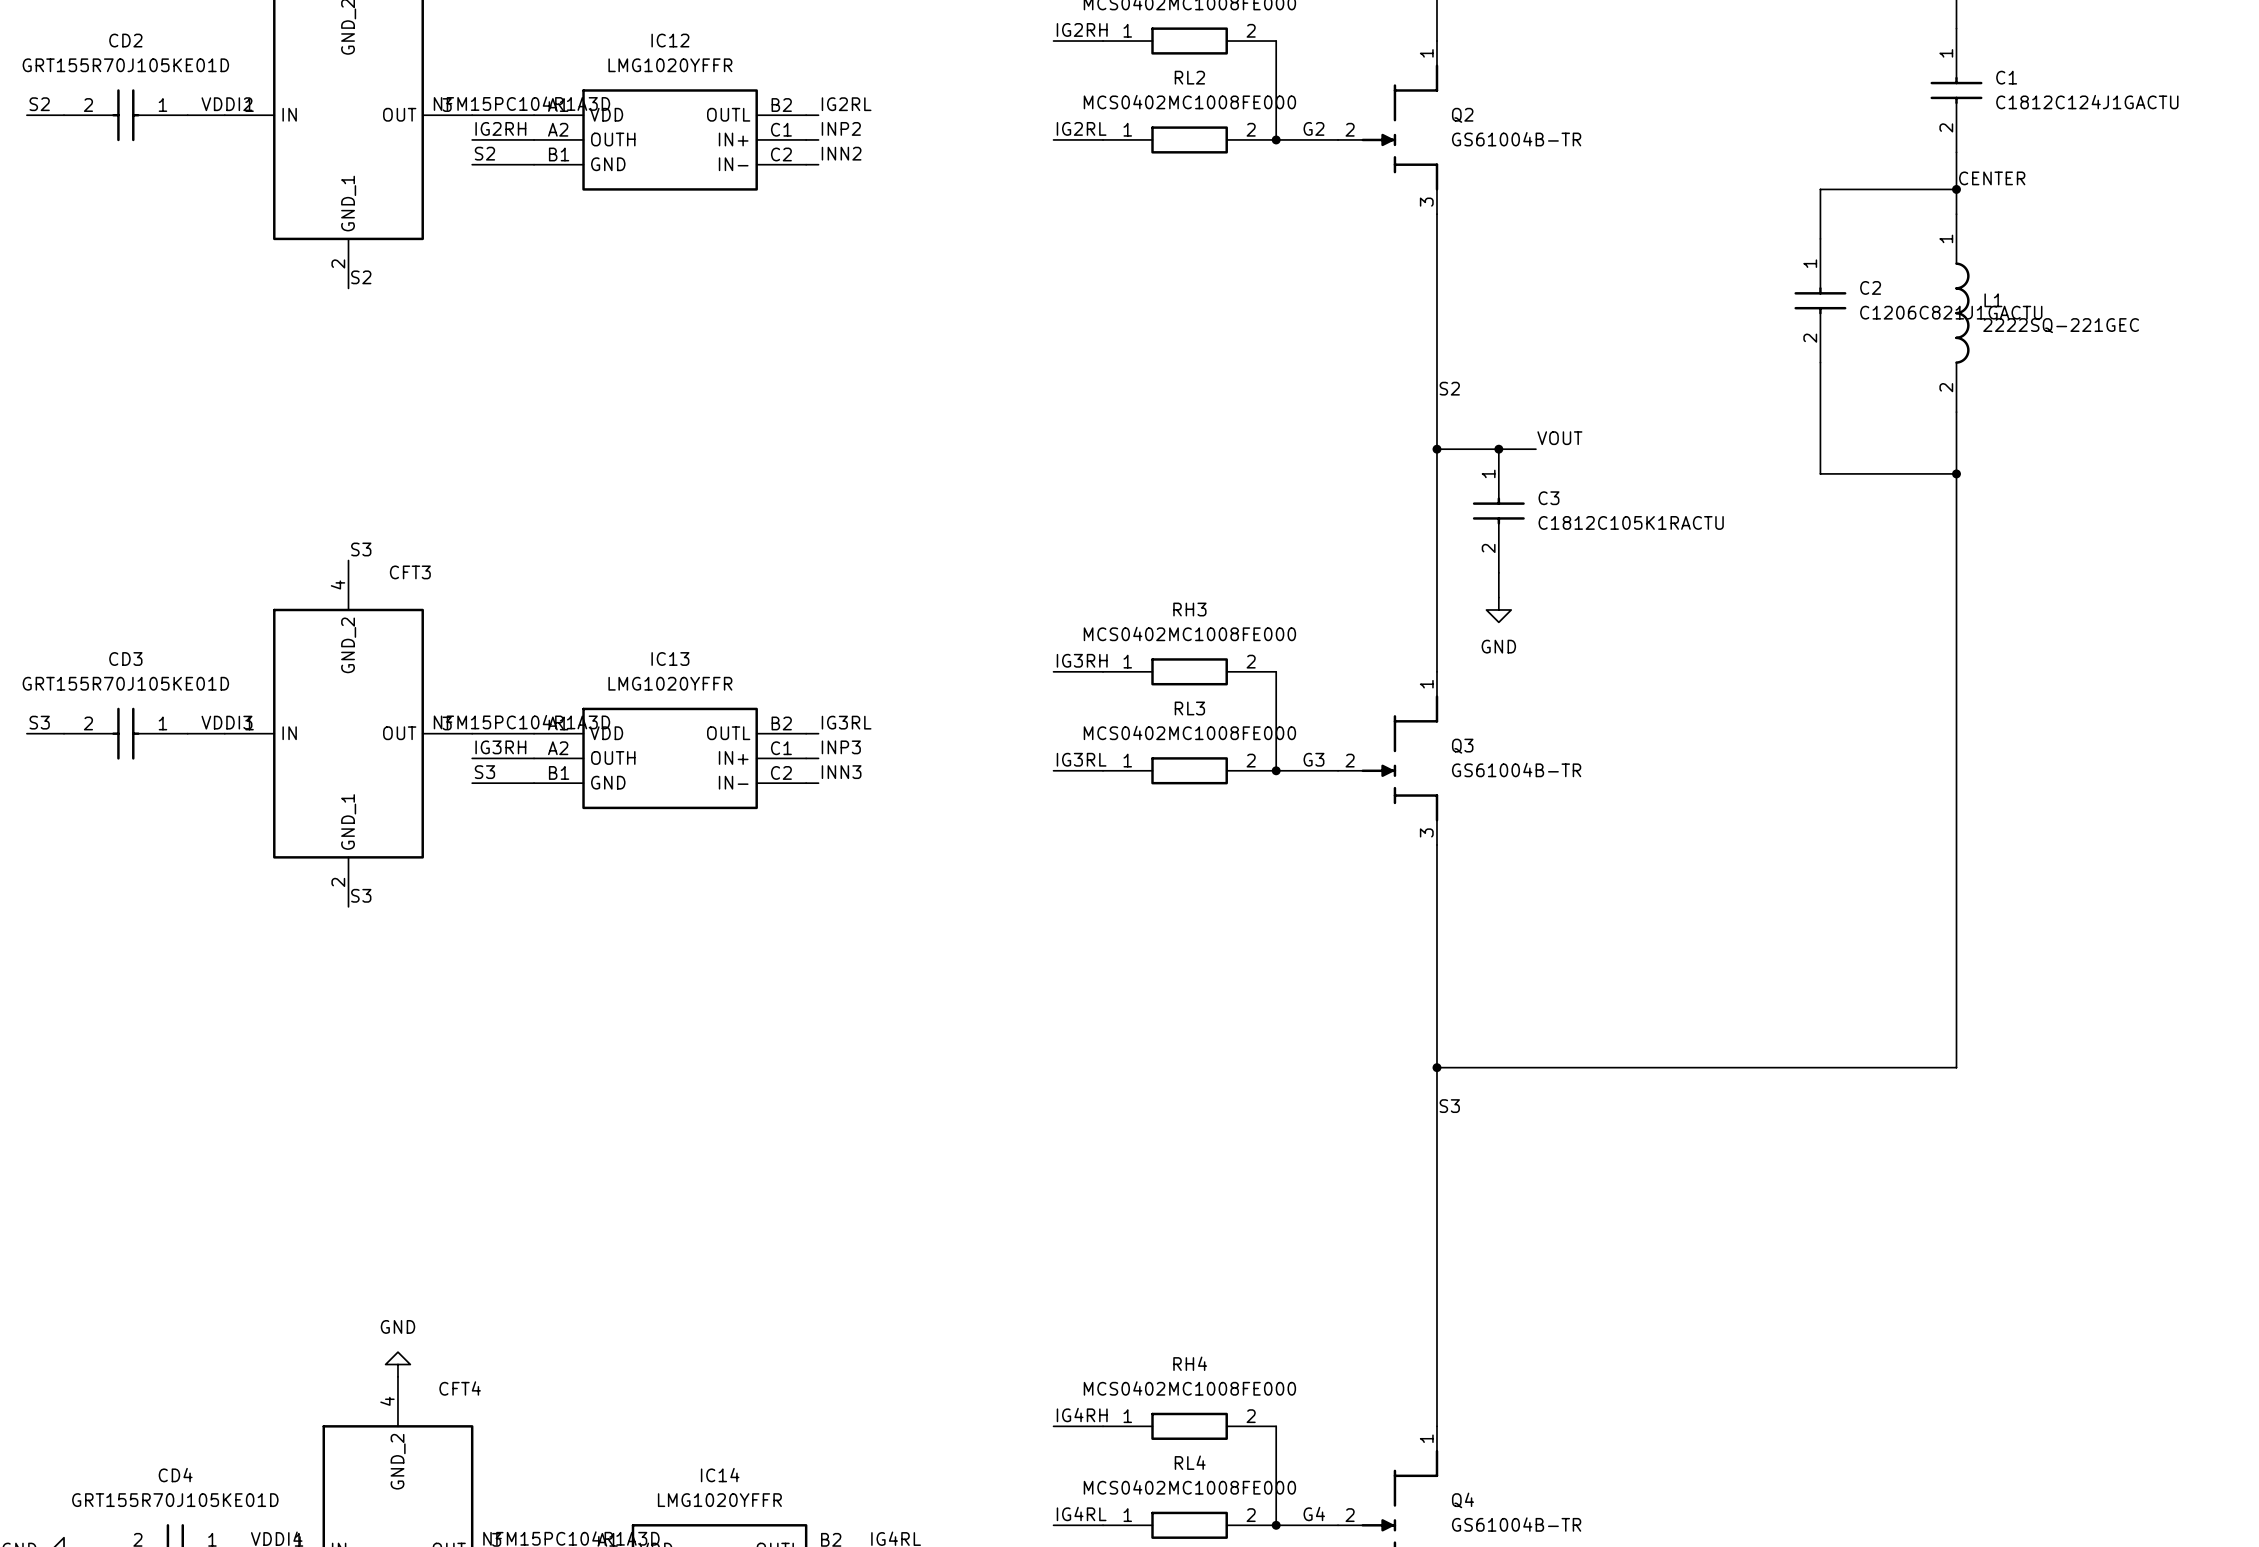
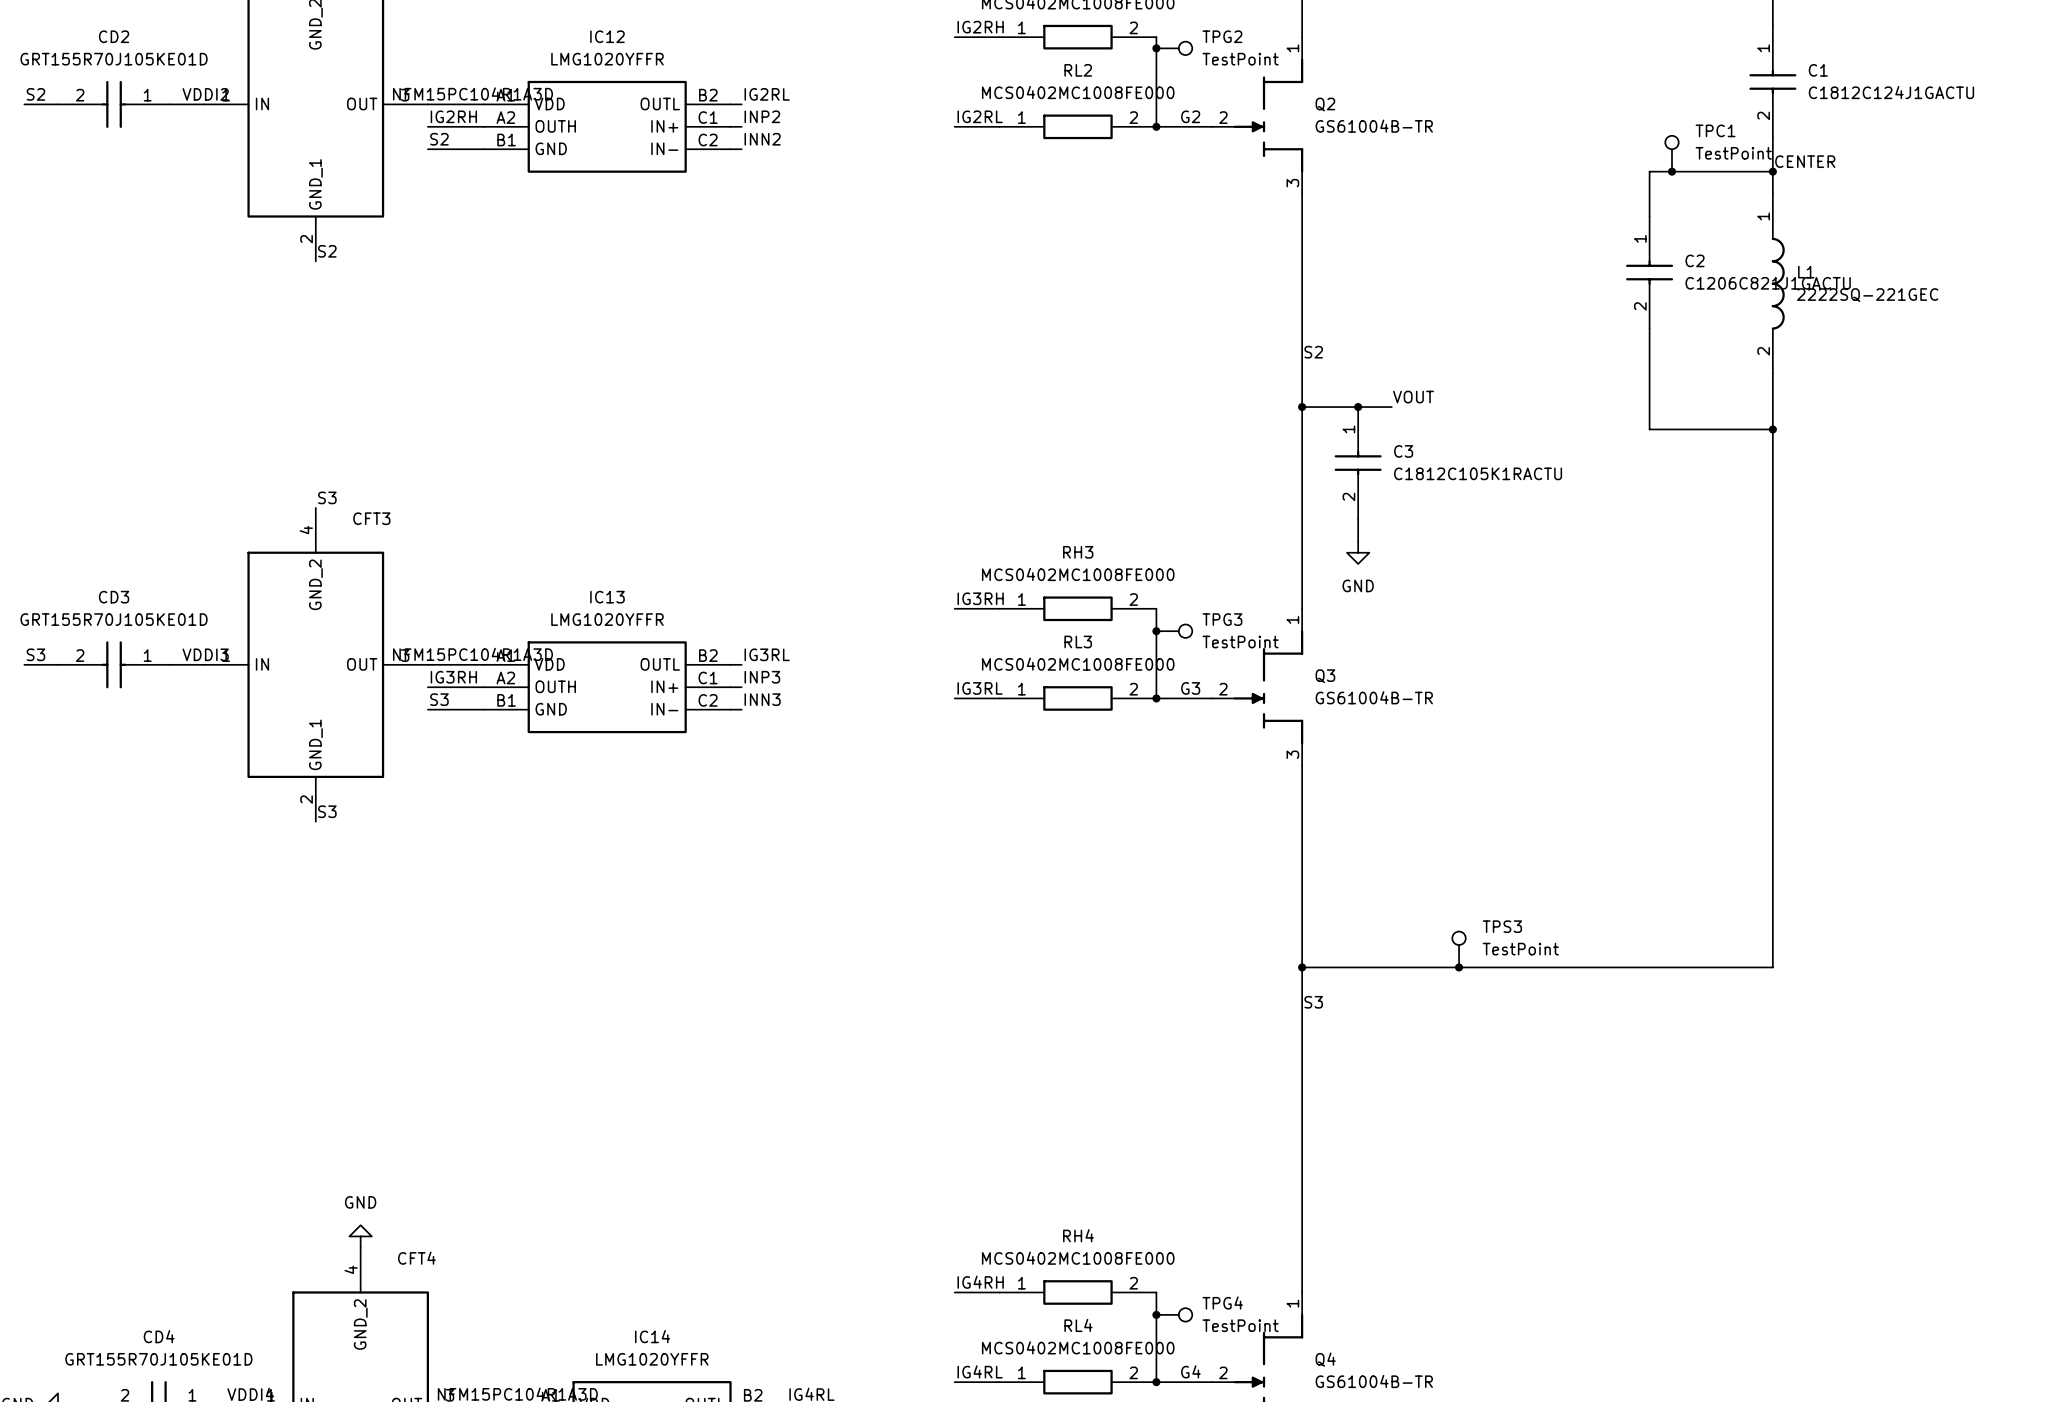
junction: none -> (1156, 48)
TPG2: none -> TestPoint (1174, 48)
TPC1: none -> TestPoint (1671, 153)
junction: none -> (1671, 171)
junction: none -> (1156, 631)
TPG3: none -> TestPoint (1174, 631)
TPS3: none -> TestPoint (1459, 949)
junction: none -> (1459, 967)
junction: none -> (1156, 1314)
TPG4: none -> TestPoint (1174, 1314)

